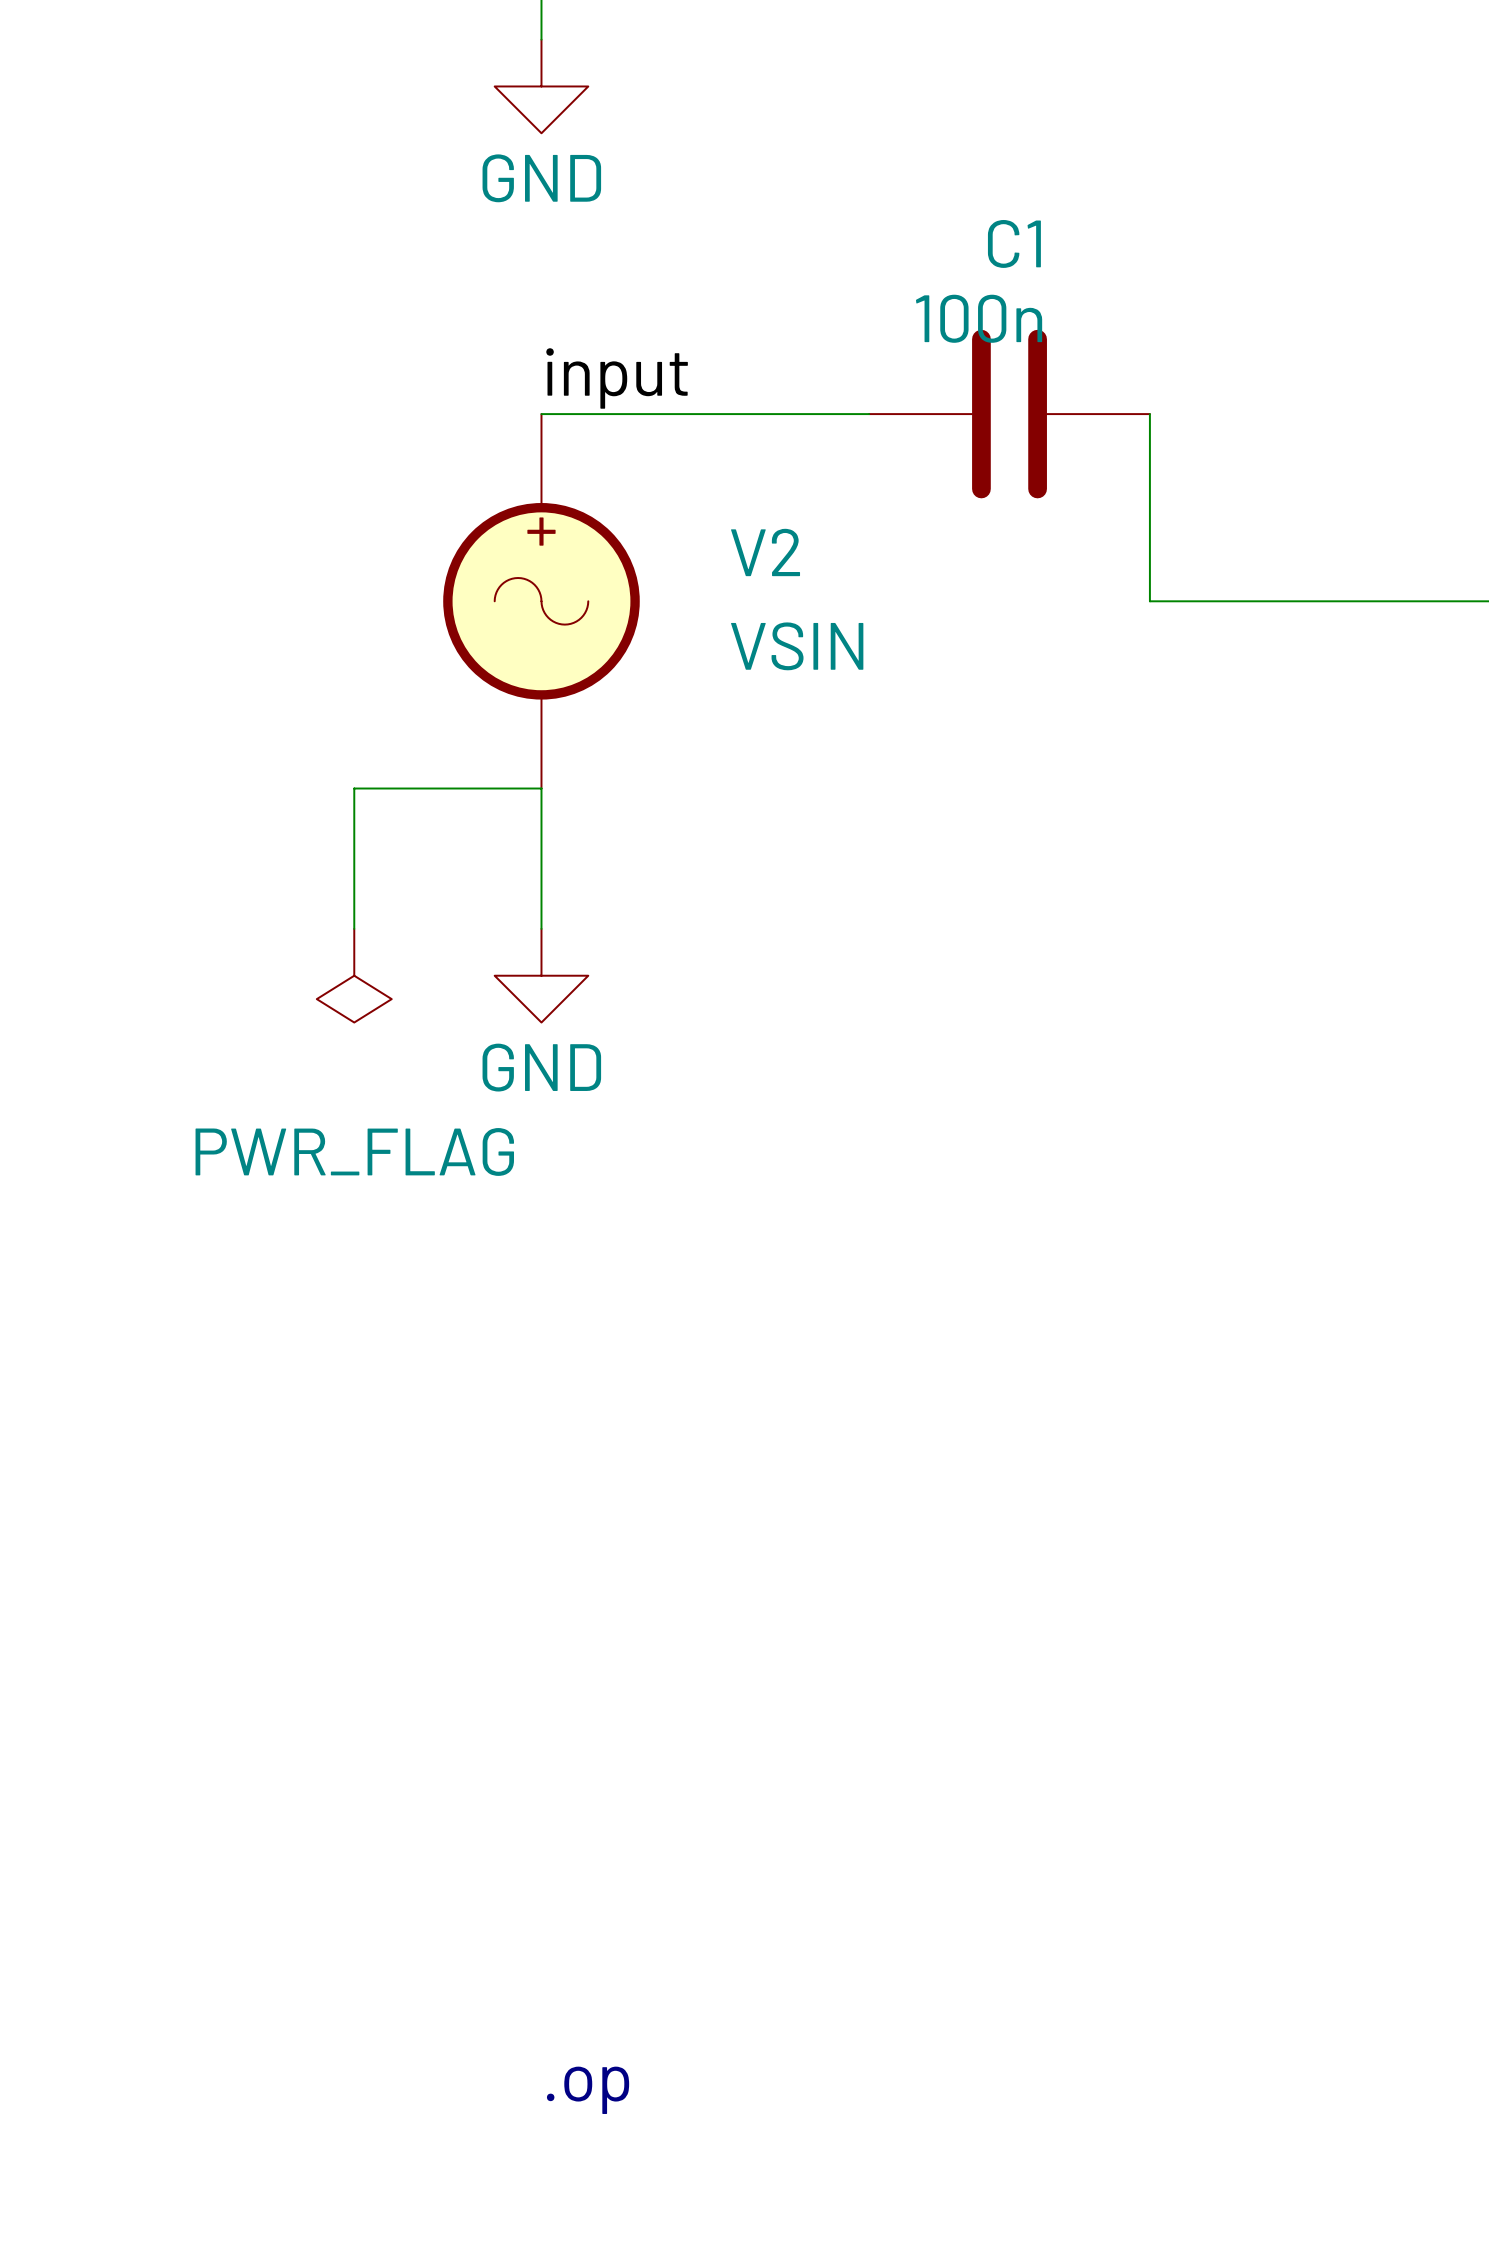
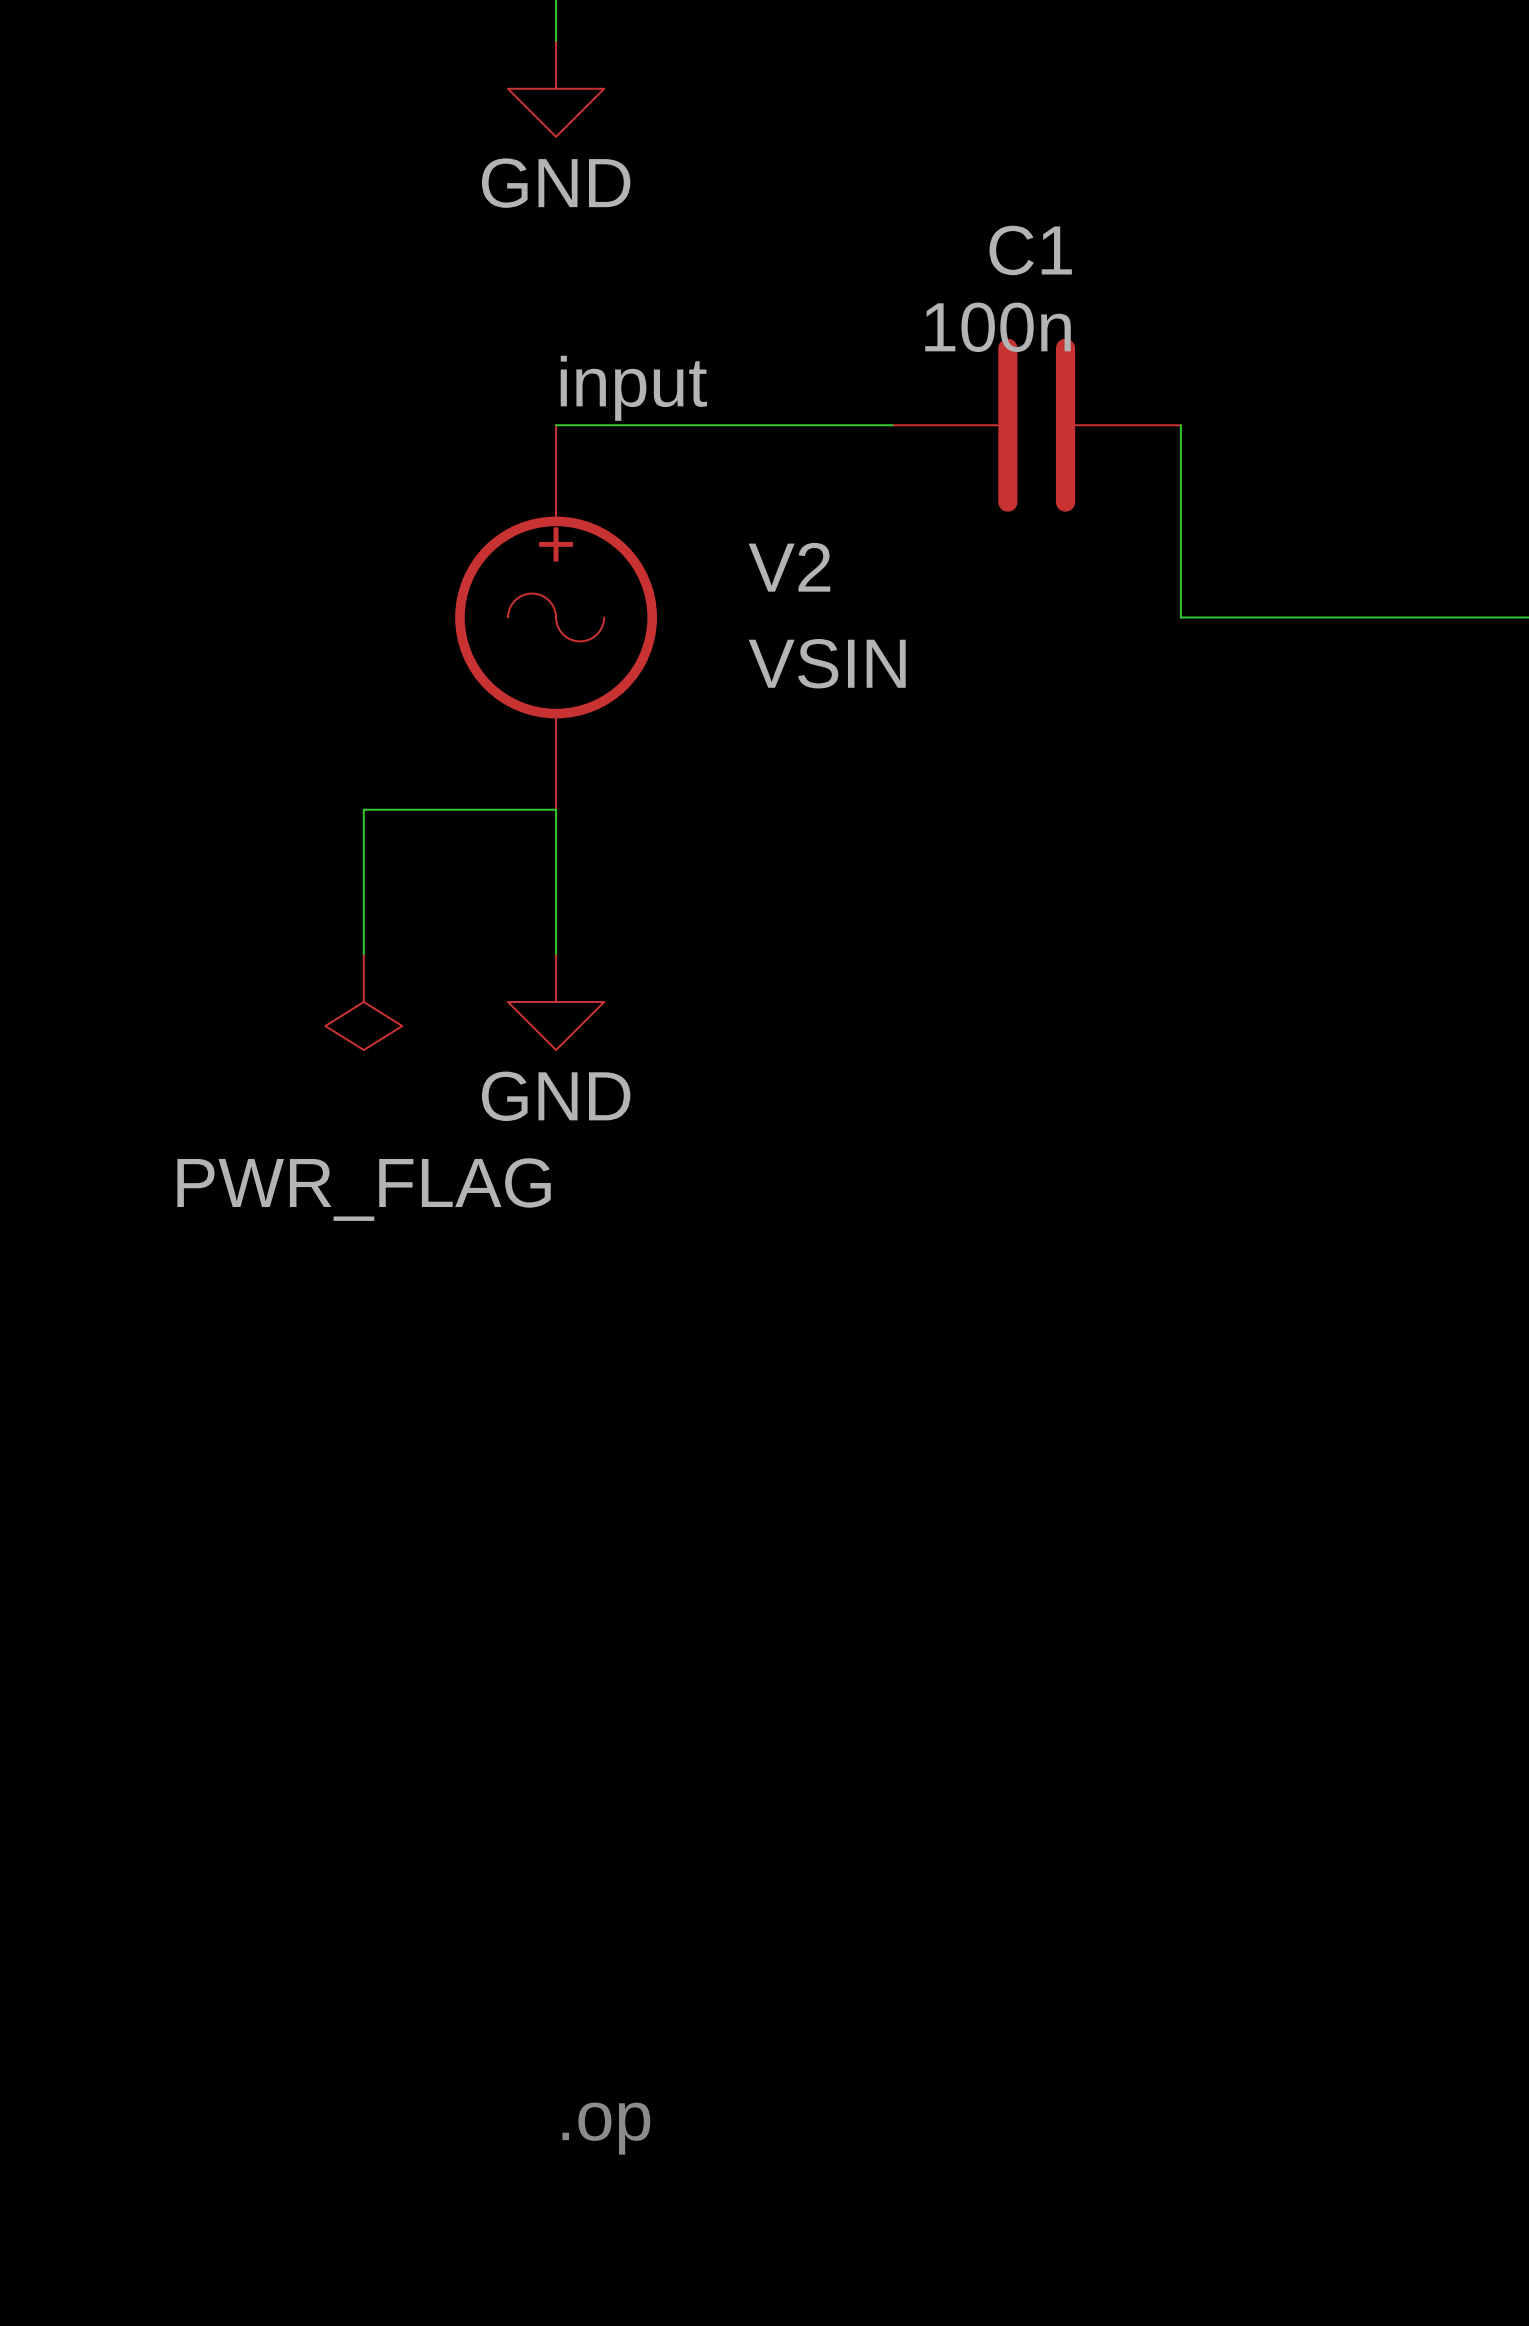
text position: .op (588, 2090) -> .op (606, 2128)

